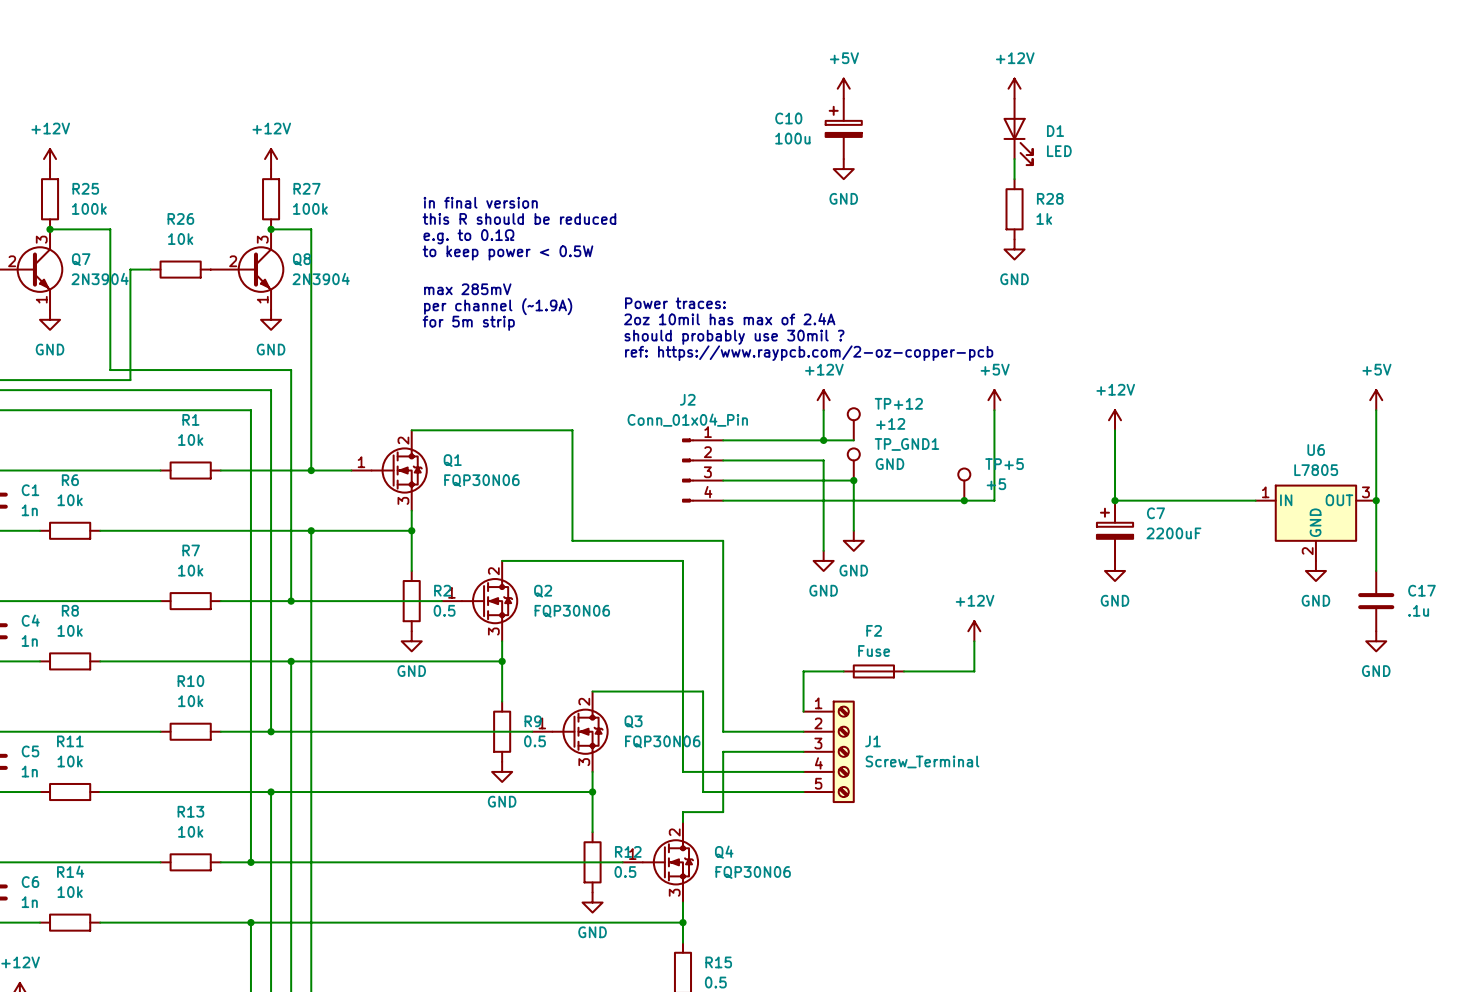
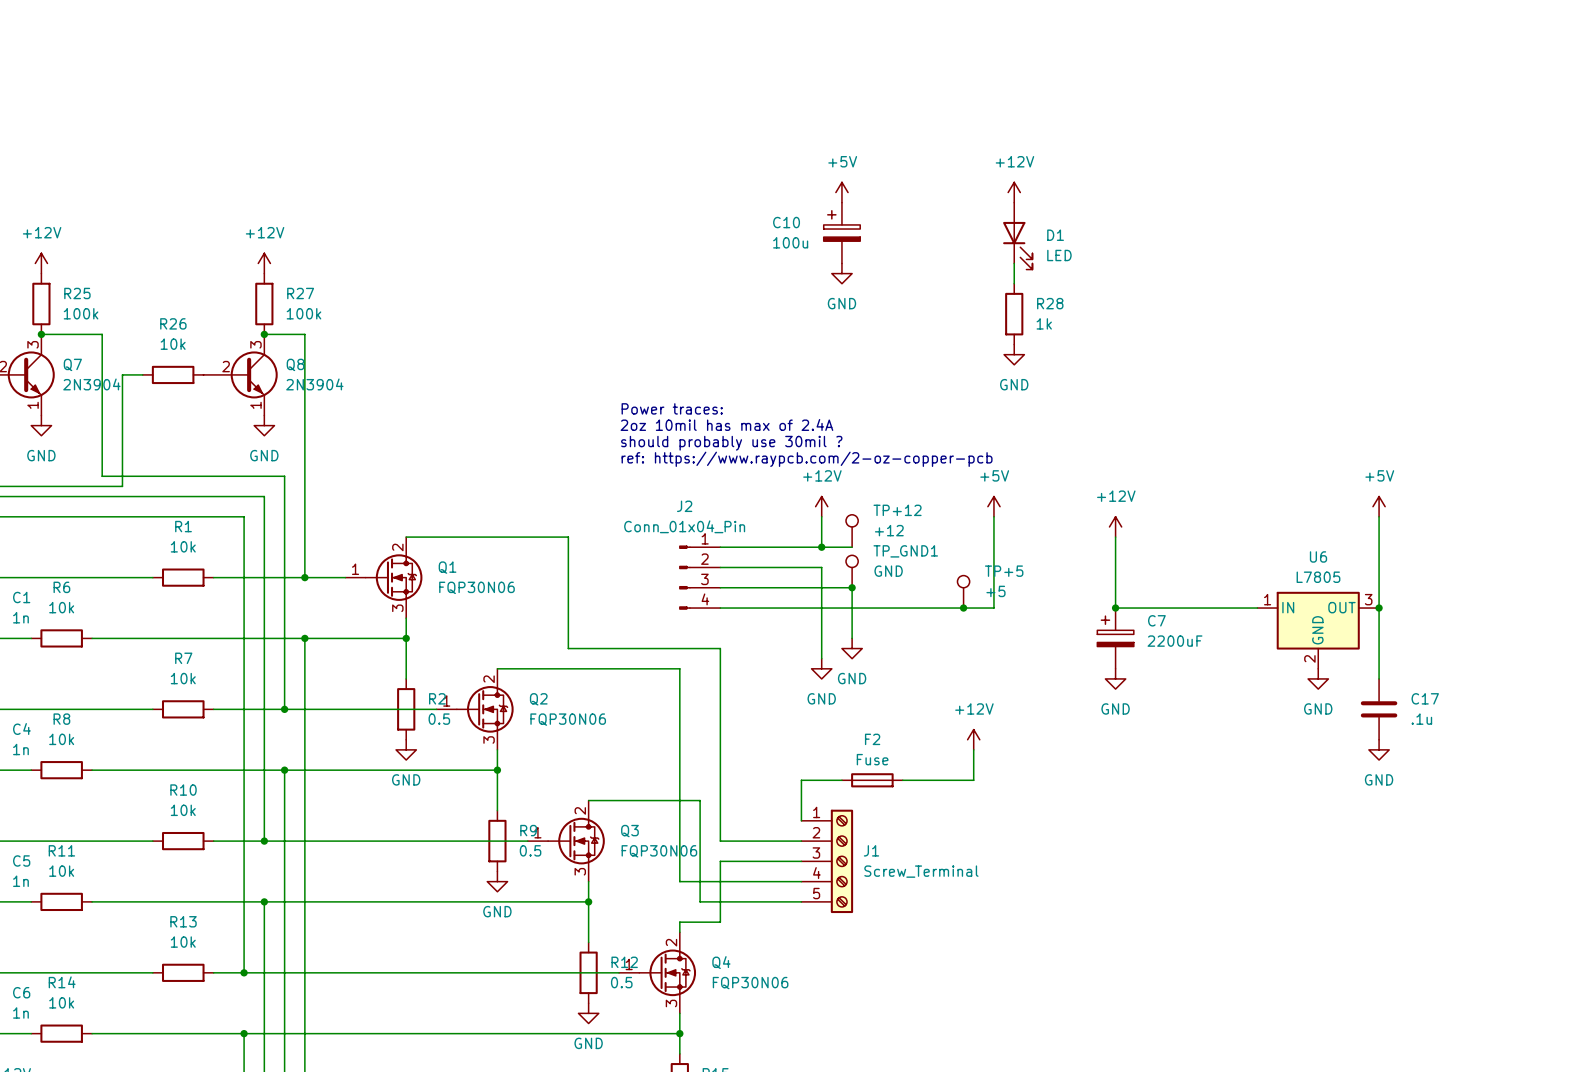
text: in final version (480, 202) -> none
text: this R should be reduced (519, 218) -> none
text: e.g. to 0.1Ω (468, 236) -> none
text: to keep power < 0.5W (507, 252) -> none
text: max 285mV (467, 289) -> none
text: per channel (~1.9A) (498, 306) -> none
text: for 5m strip (468, 323) -> none

